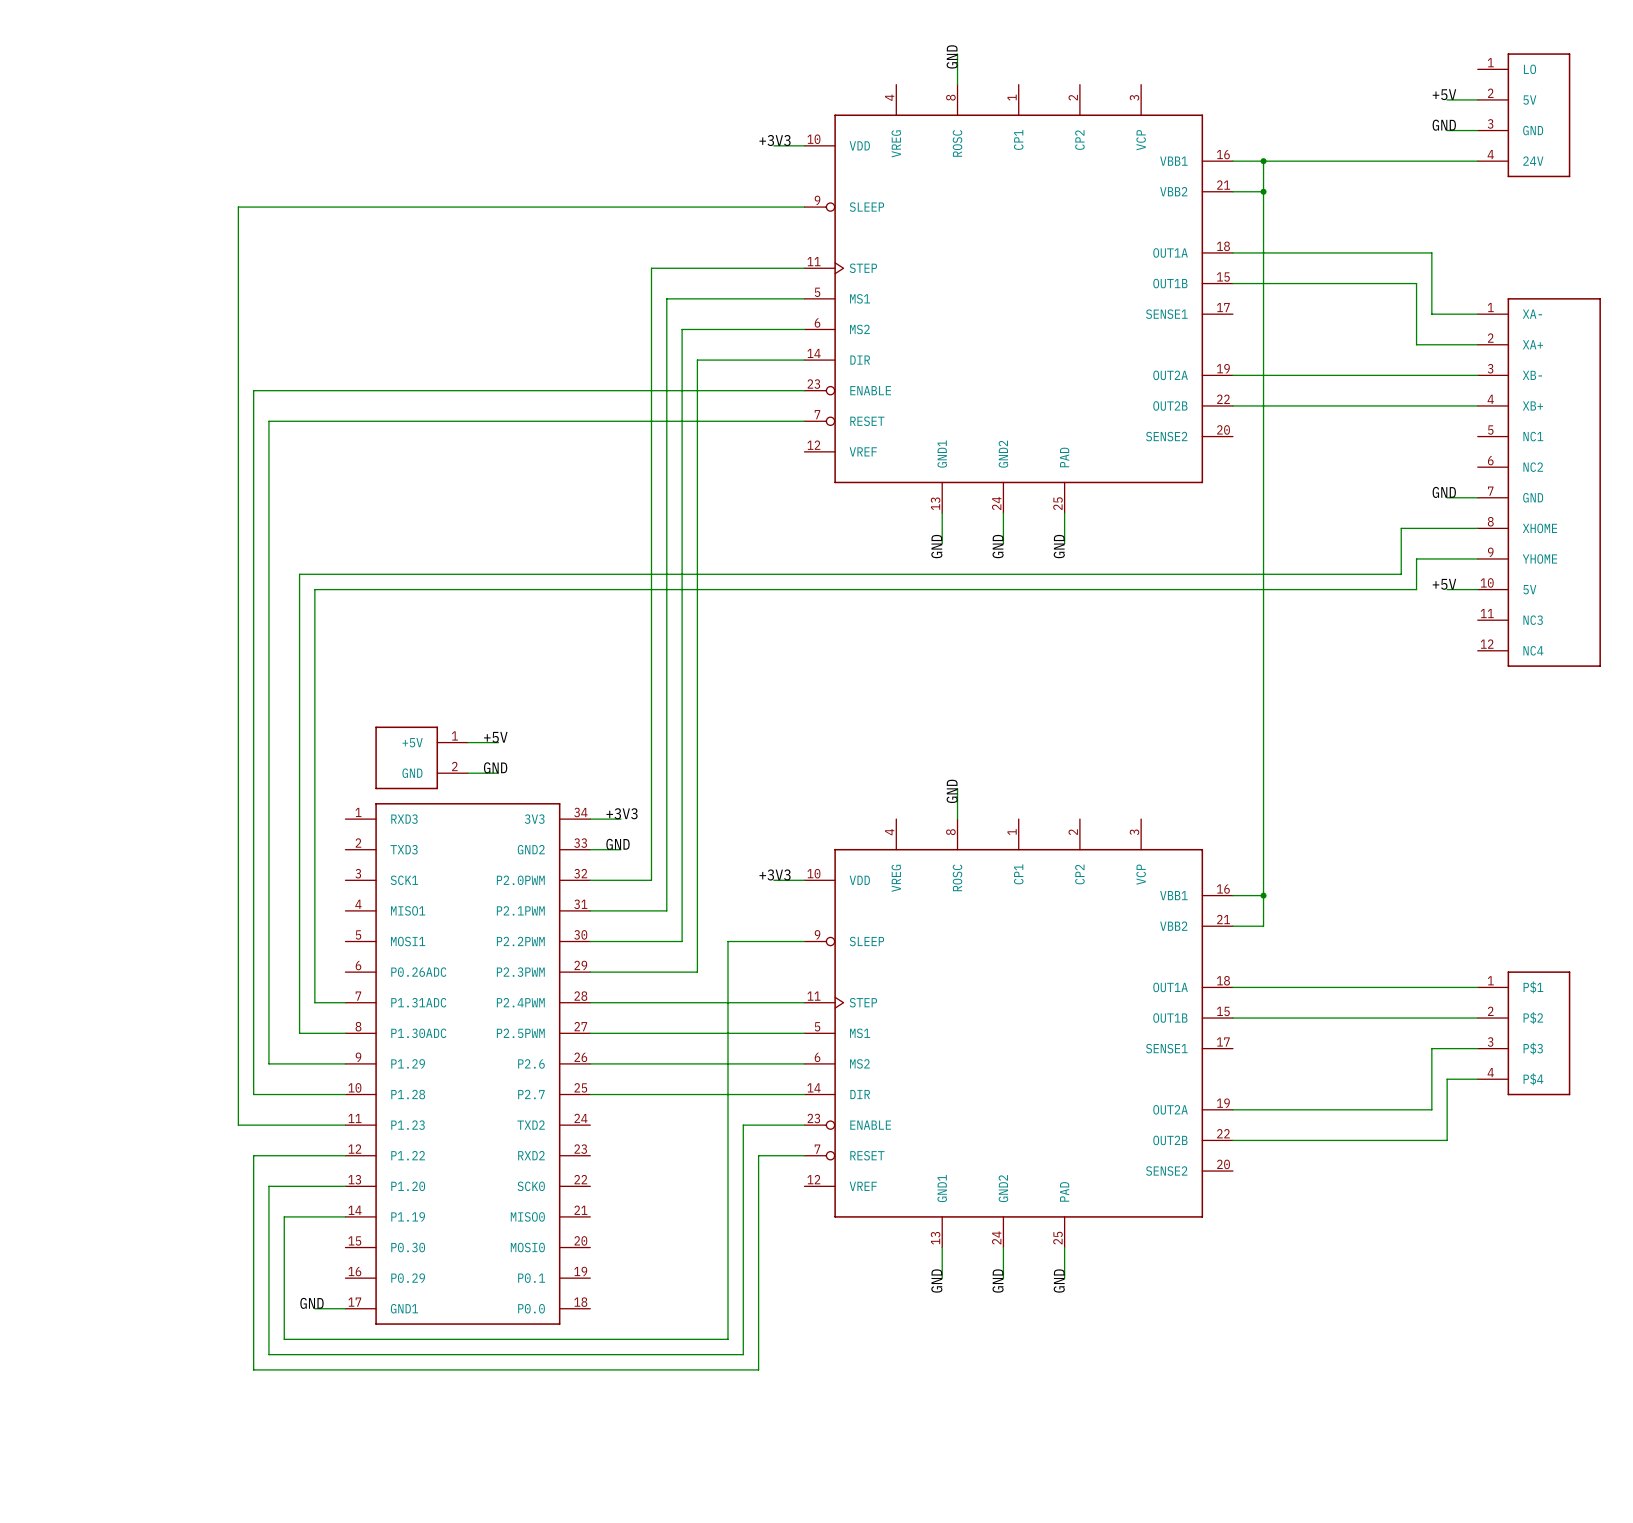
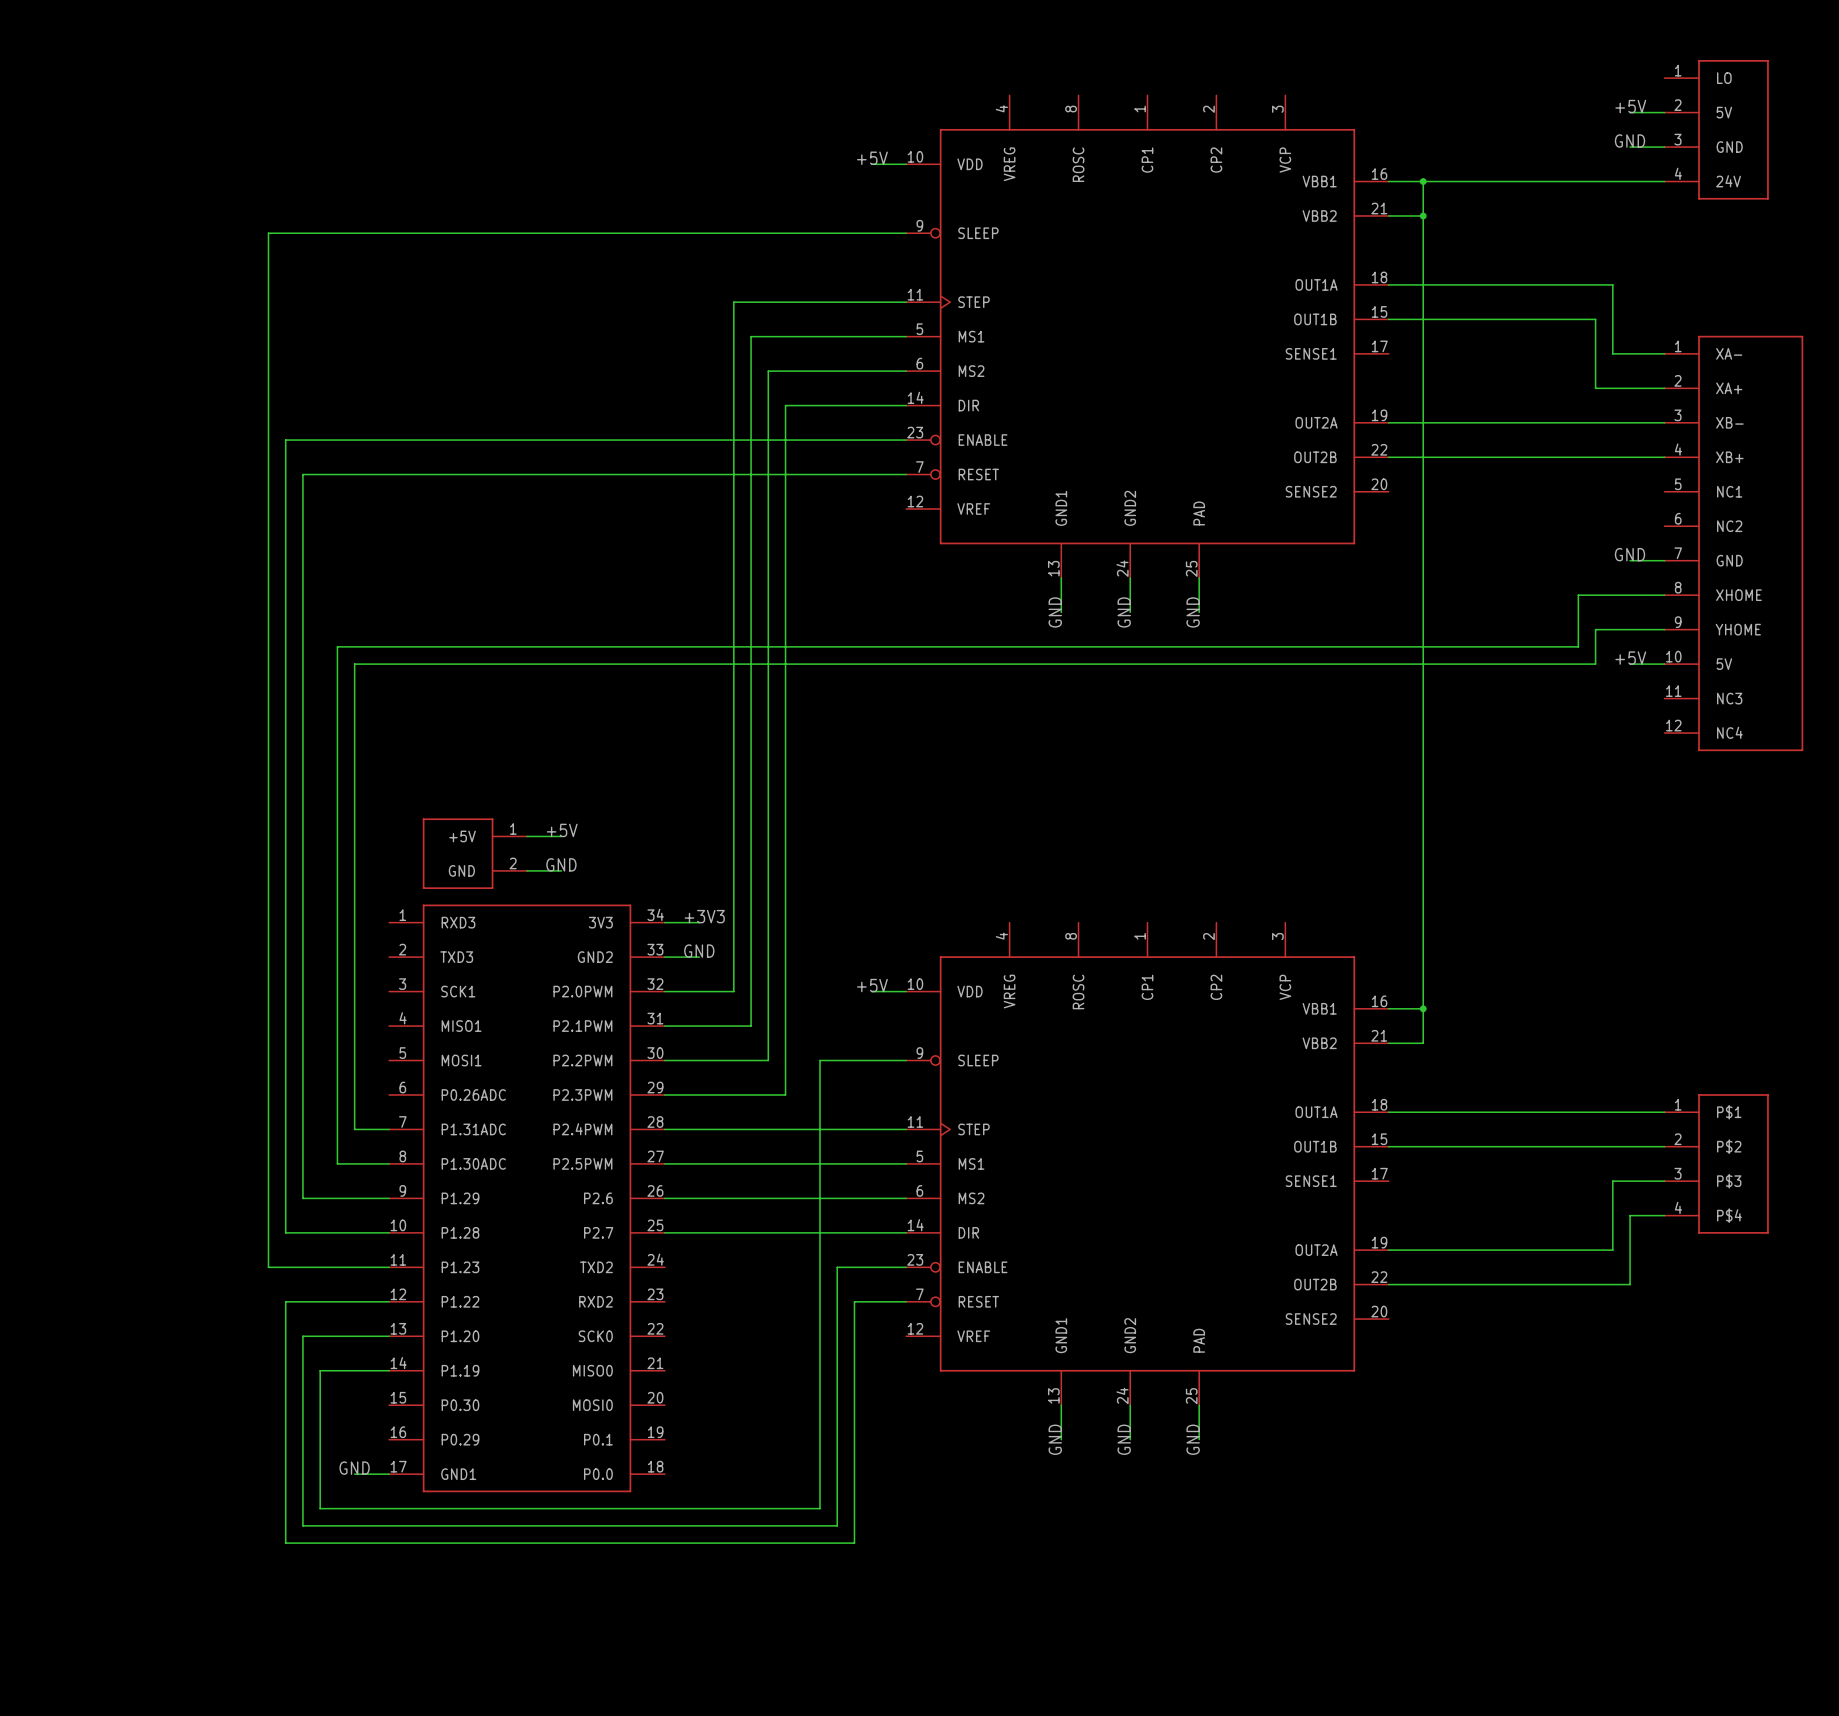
wire: (957, 54) (957, 84) -> none
label: GND (952, 56) -> none
label: +3V3 (775, 140) -> +5V (872, 158)
wire: (957, 788) (957, 819) -> none
label: GND (952, 791) -> none
label: +3V3 (775, 874) -> +5V (872, 985)

